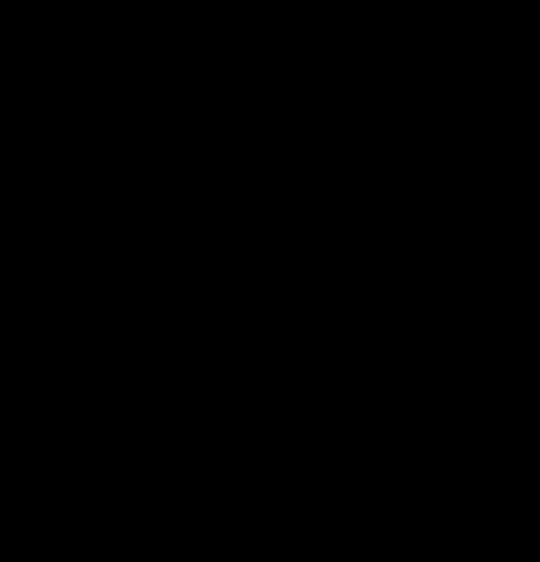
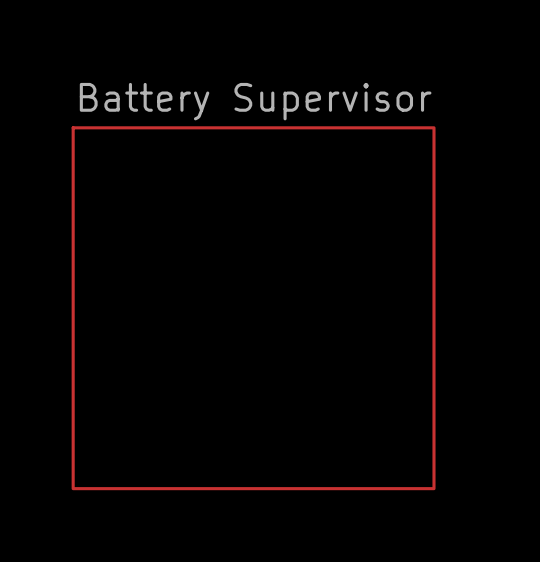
sheet Battery Supervisor: none -> (253, 308)

